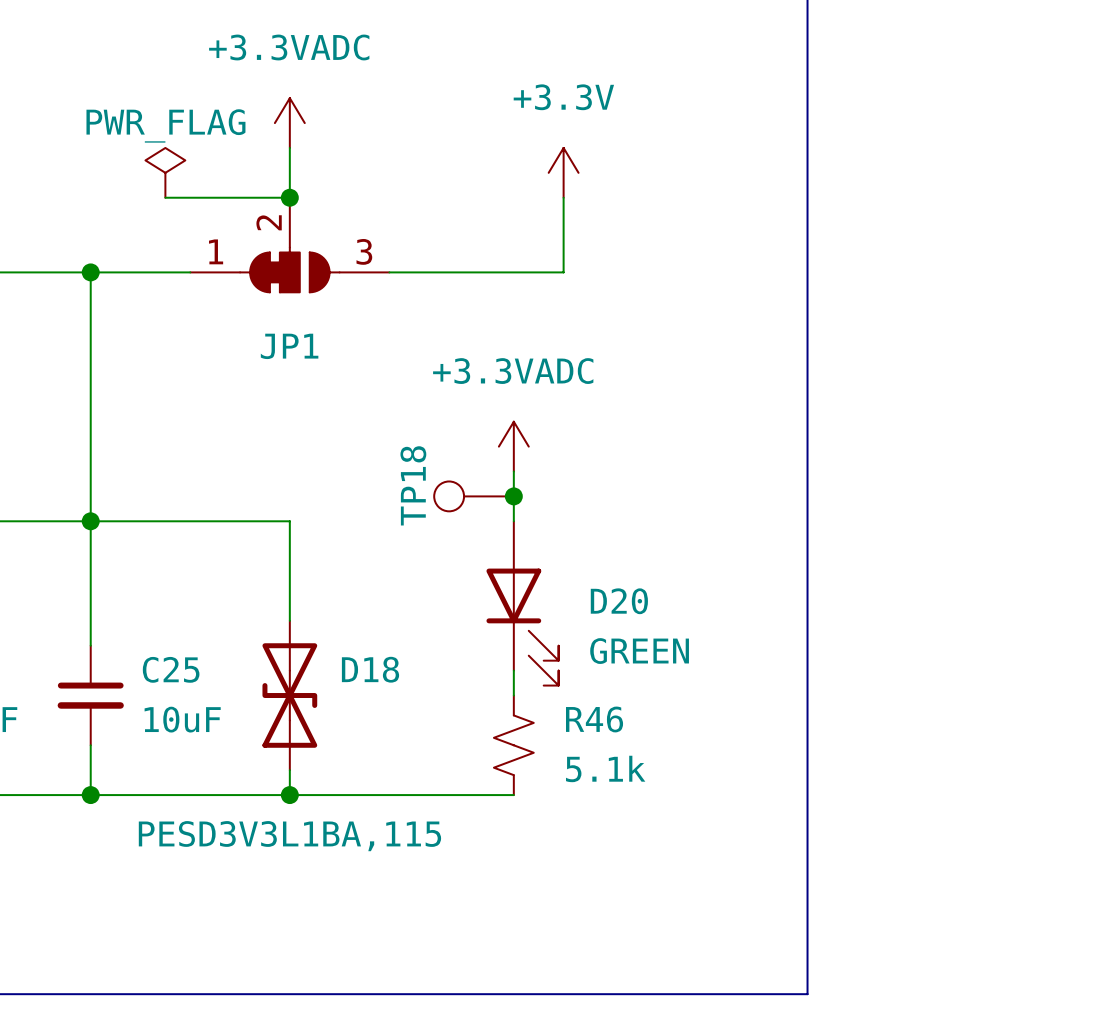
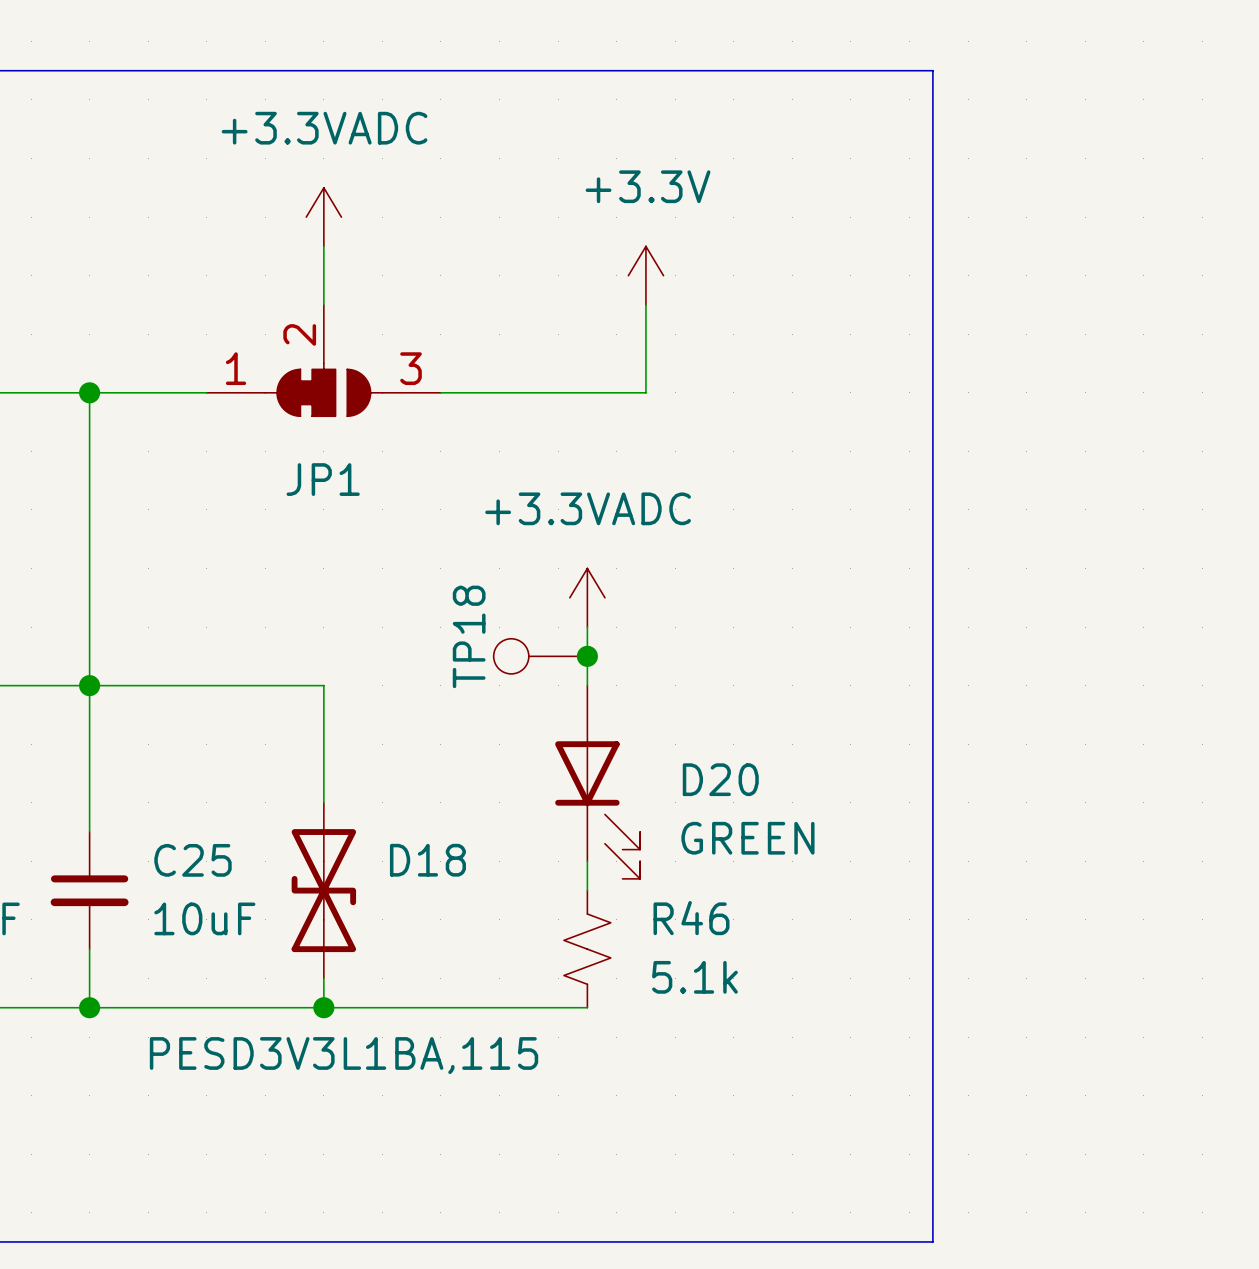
power symbol: PWR_FLAG (165, 172) -> none
wire: (165, 197) (289, 197) -> none
junction: (289, 197) -> none

